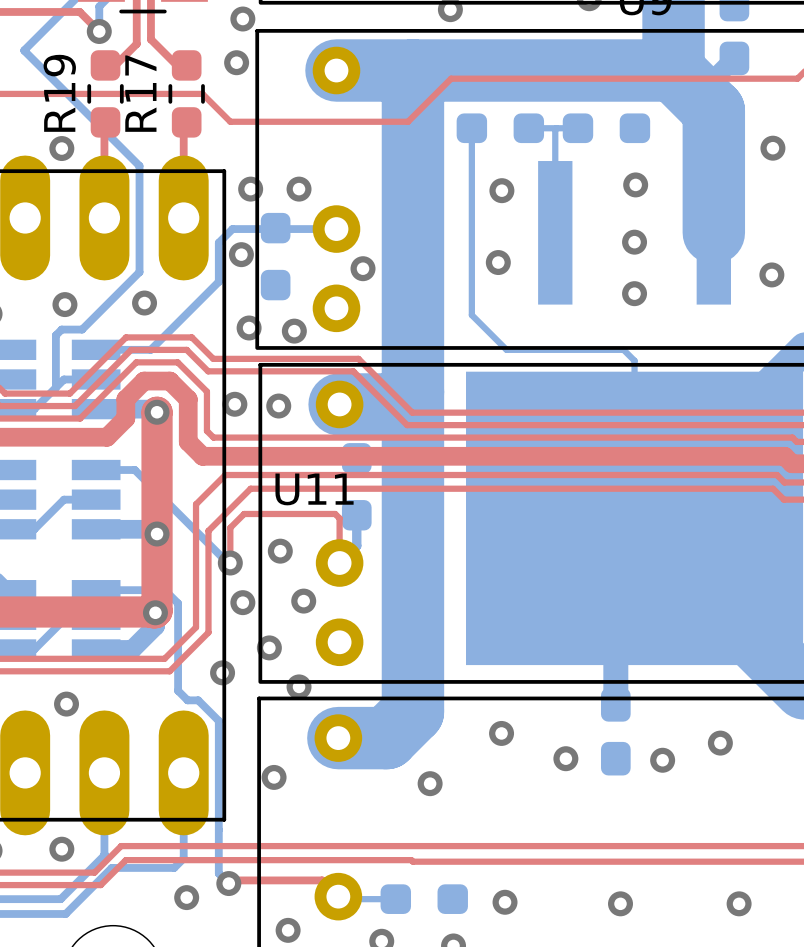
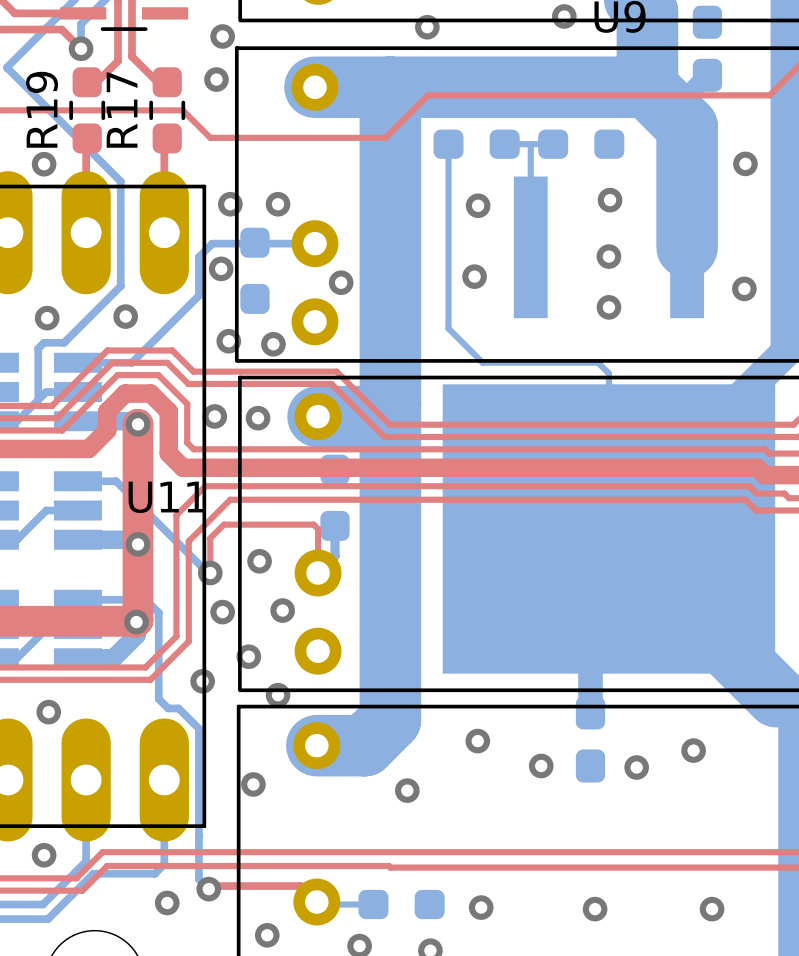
U11 name position: U11 (314, 489) -> U11 (167, 497)

